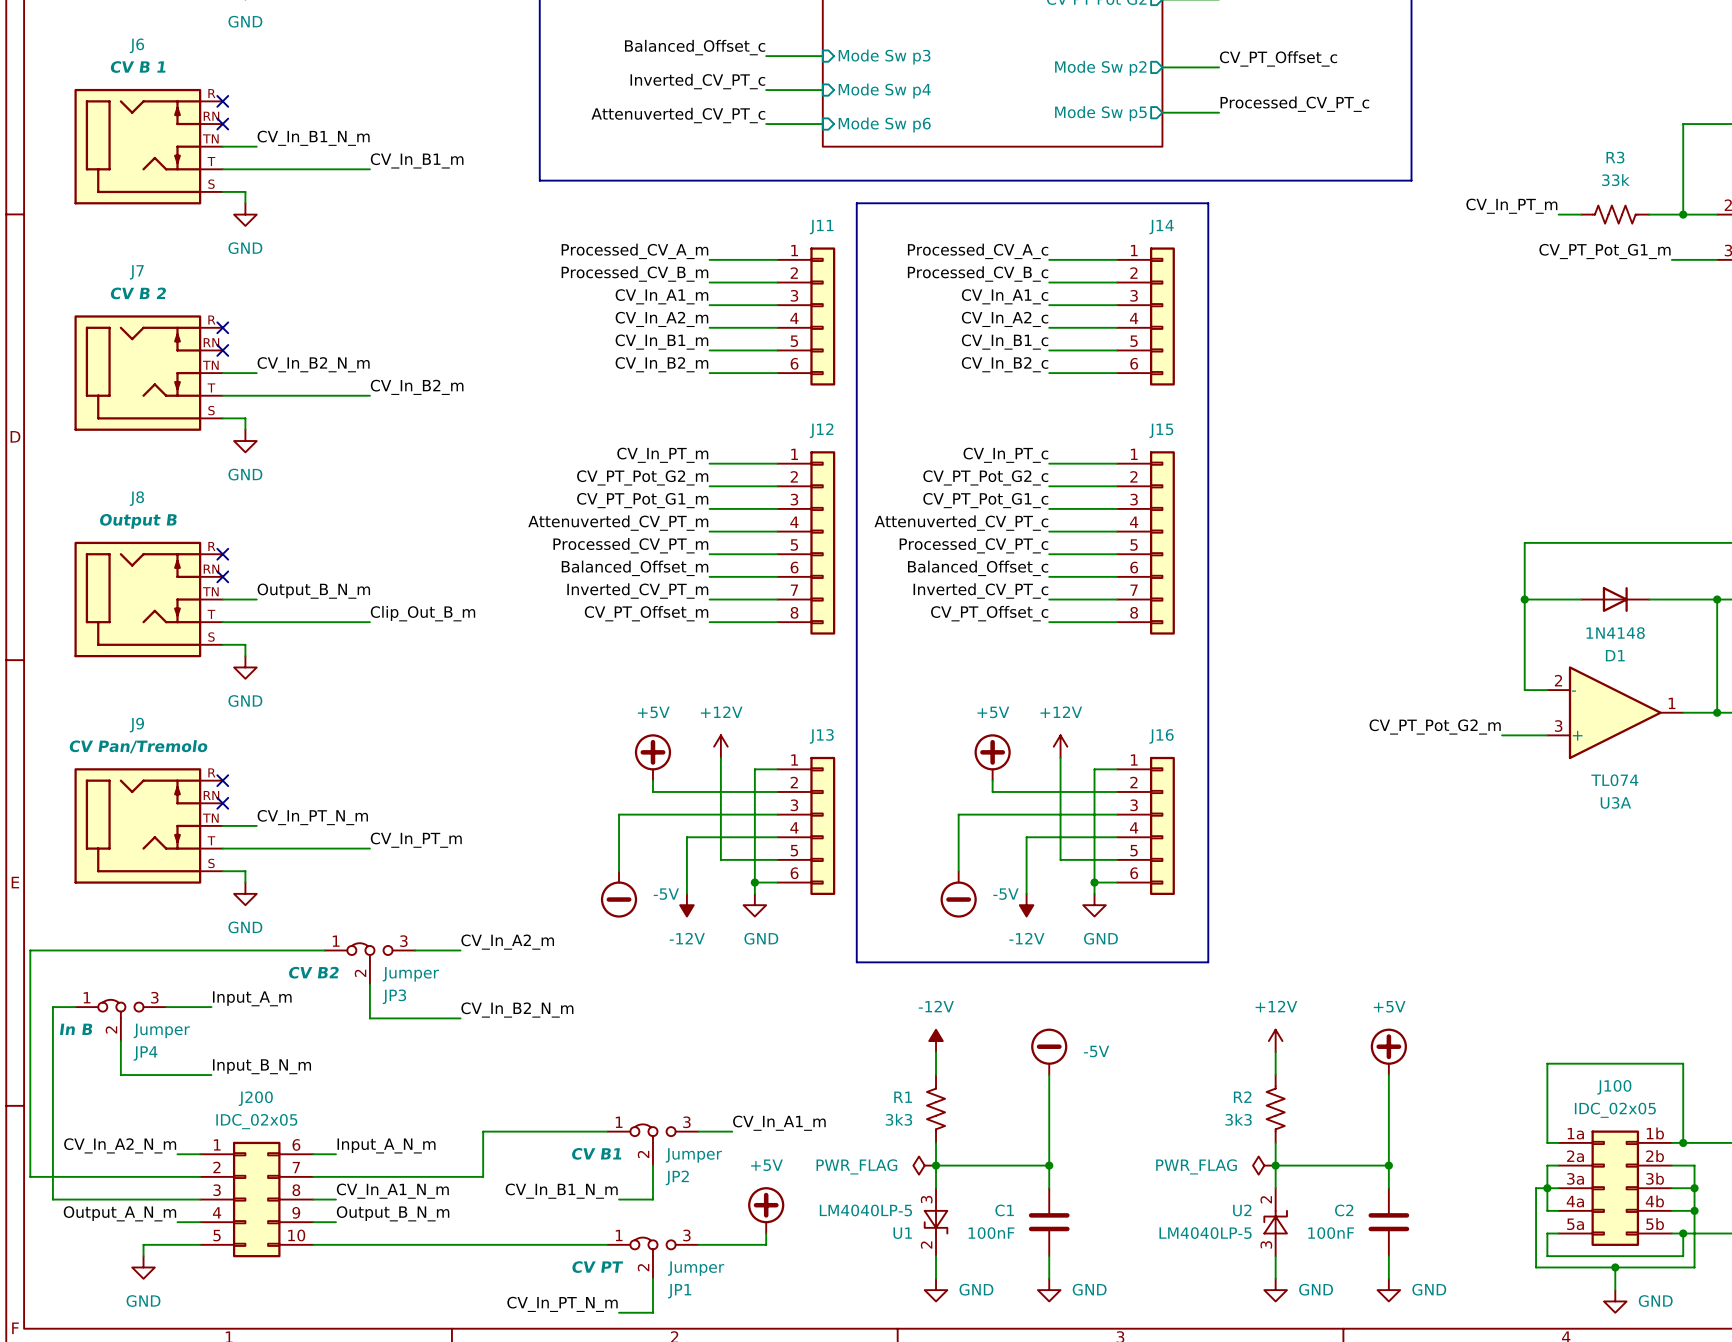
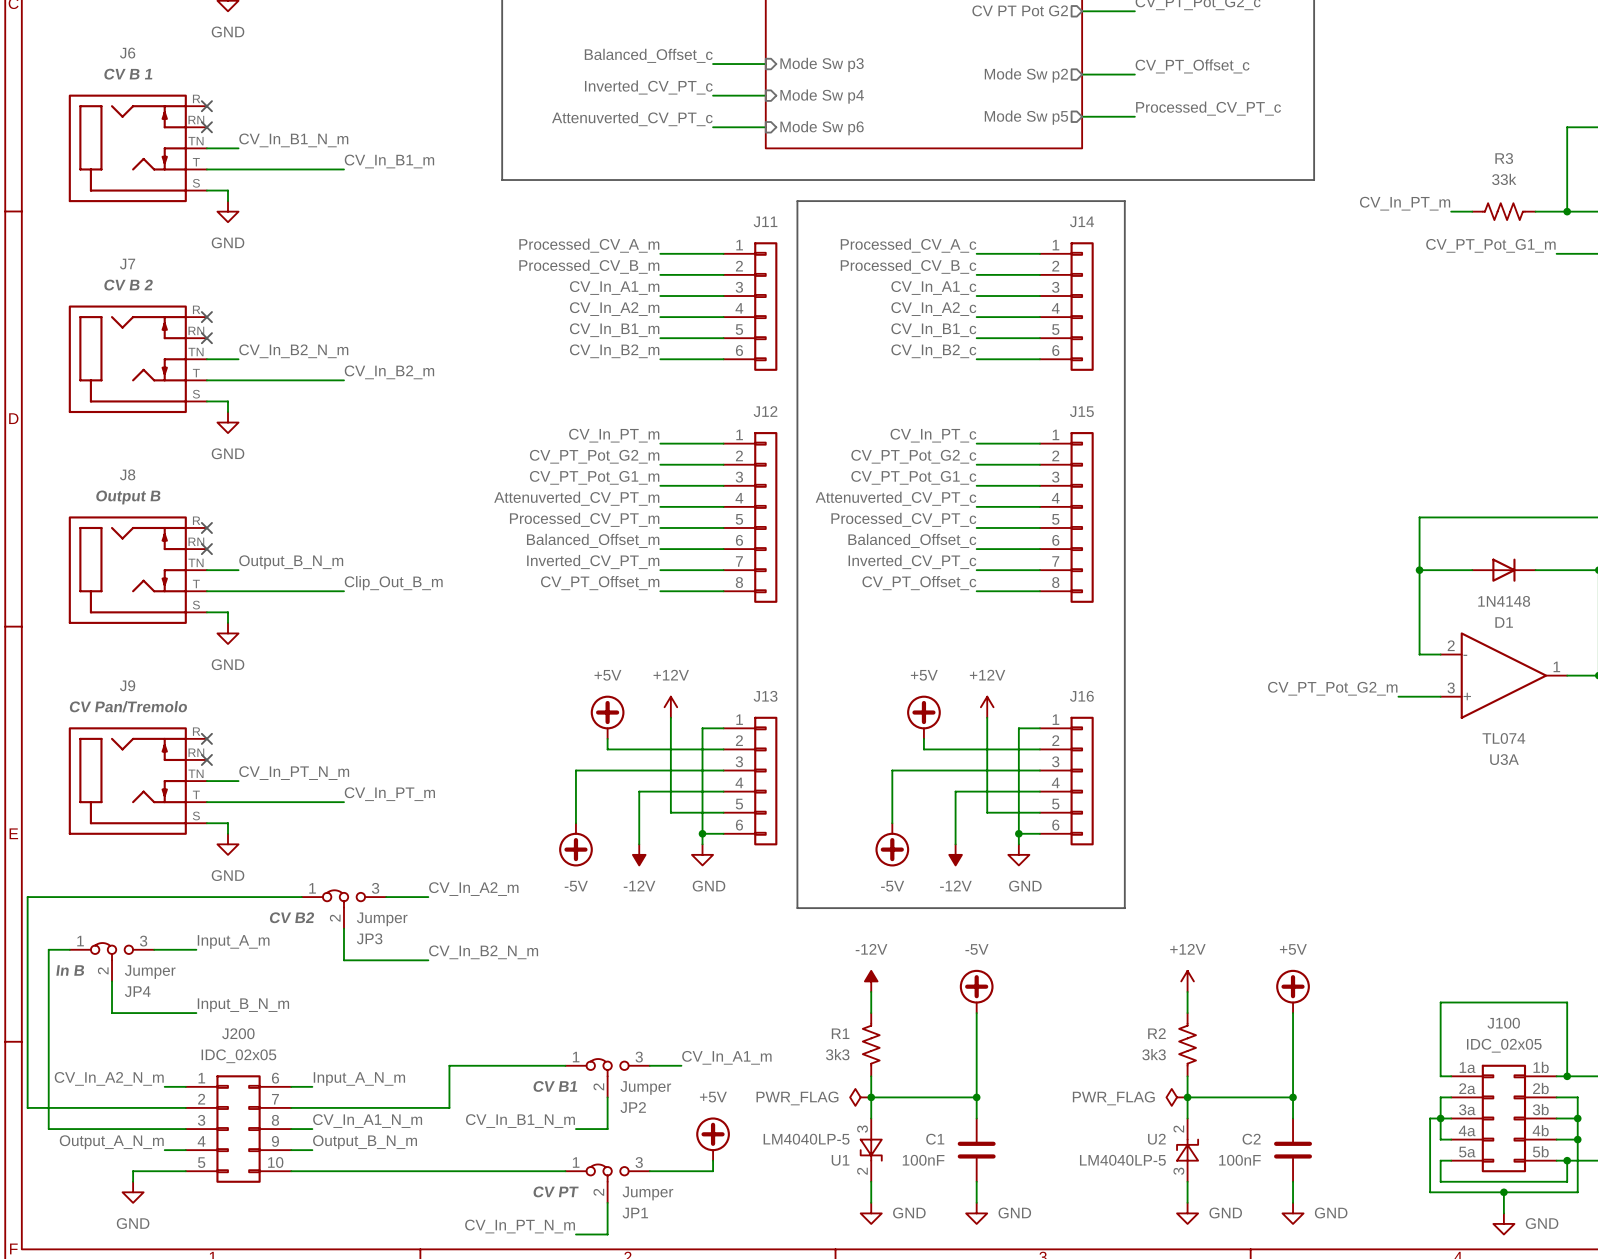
power symbol shape: [600, 871, 638, 918] -> [559, 823, 593, 867]
power symbol shape: [940, 871, 977, 918] -> [875, 823, 910, 867]
power symbol text position: -5V (666, 894) -> -5V (576, 886)
power symbol text position: -5V (1005, 894) -> -5V (892, 886)
power symbol shape: [1031, 1028, 1068, 1076] -> [959, 969, 994, 1014]
power symbol text position: -5V (1096, 1051) -> -5V (976, 949)

